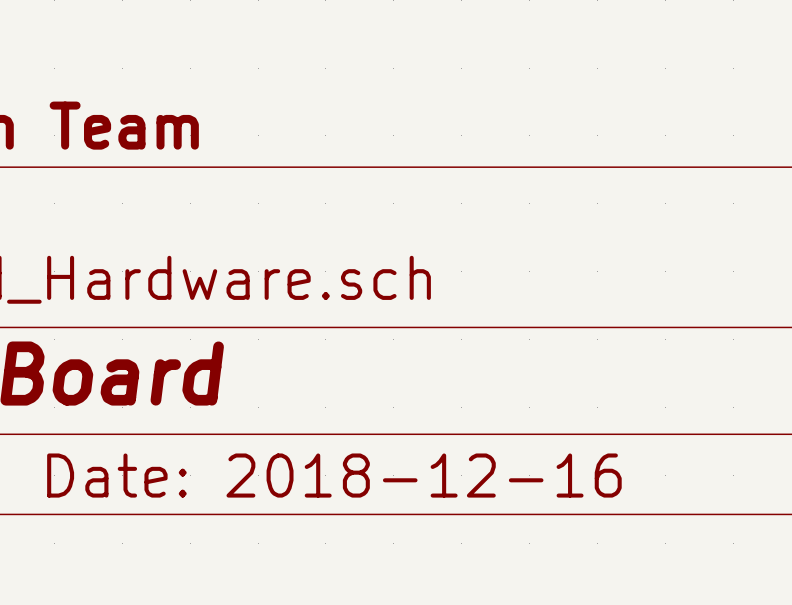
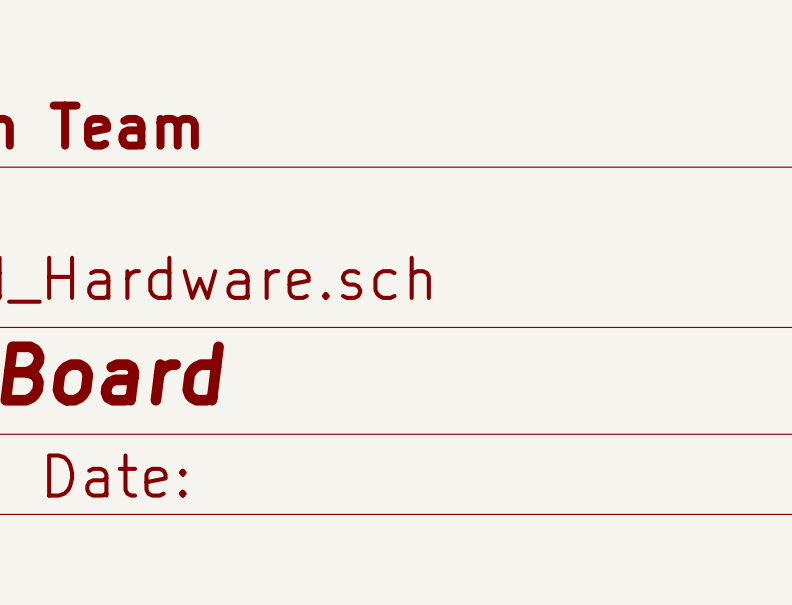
title block: Date: 2018-12-16 (334, 475) -> Date: (116, 475)

